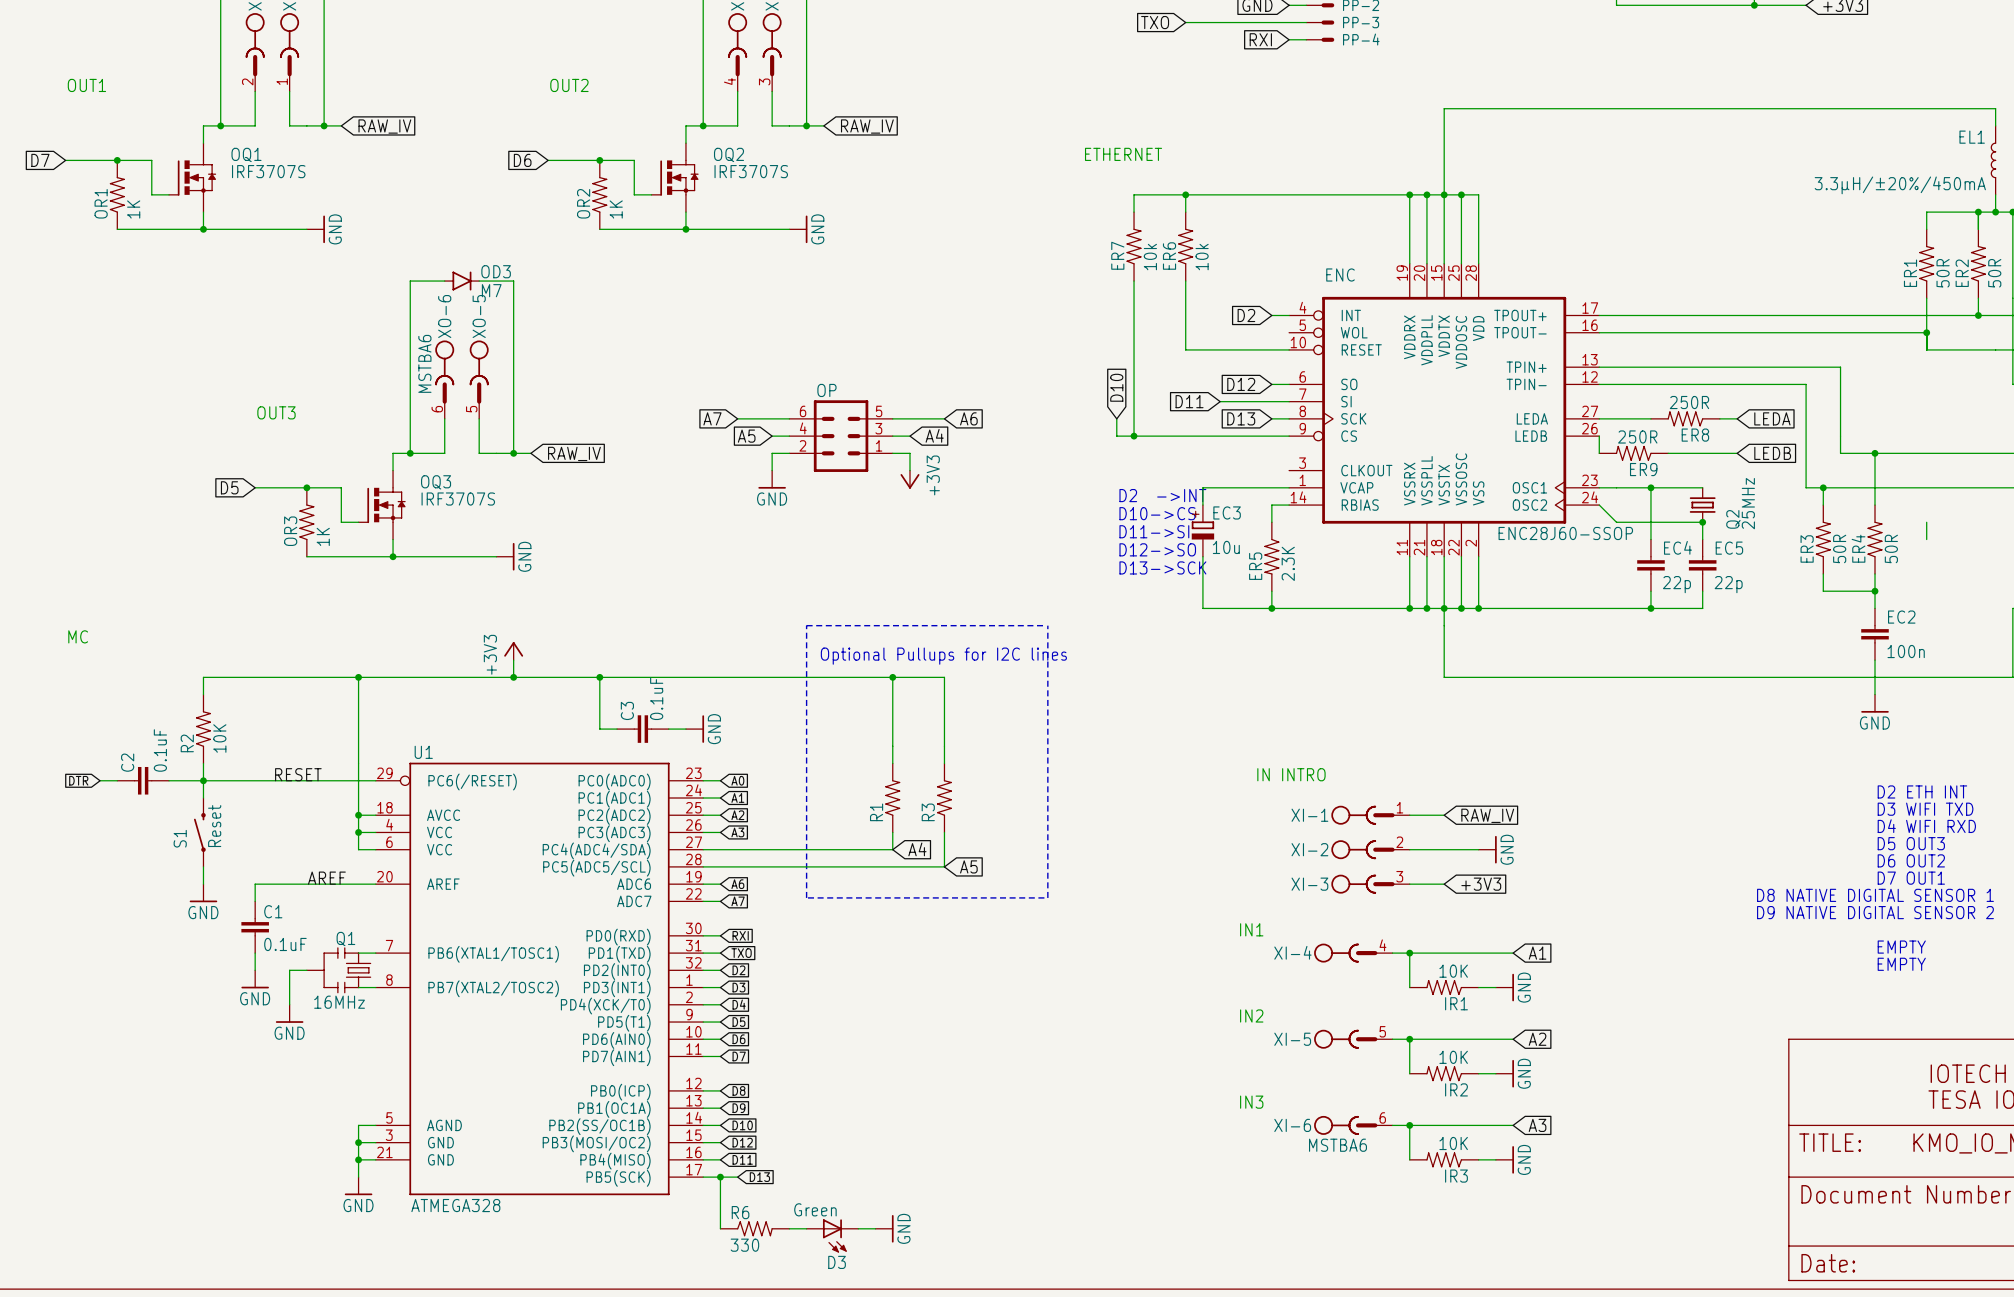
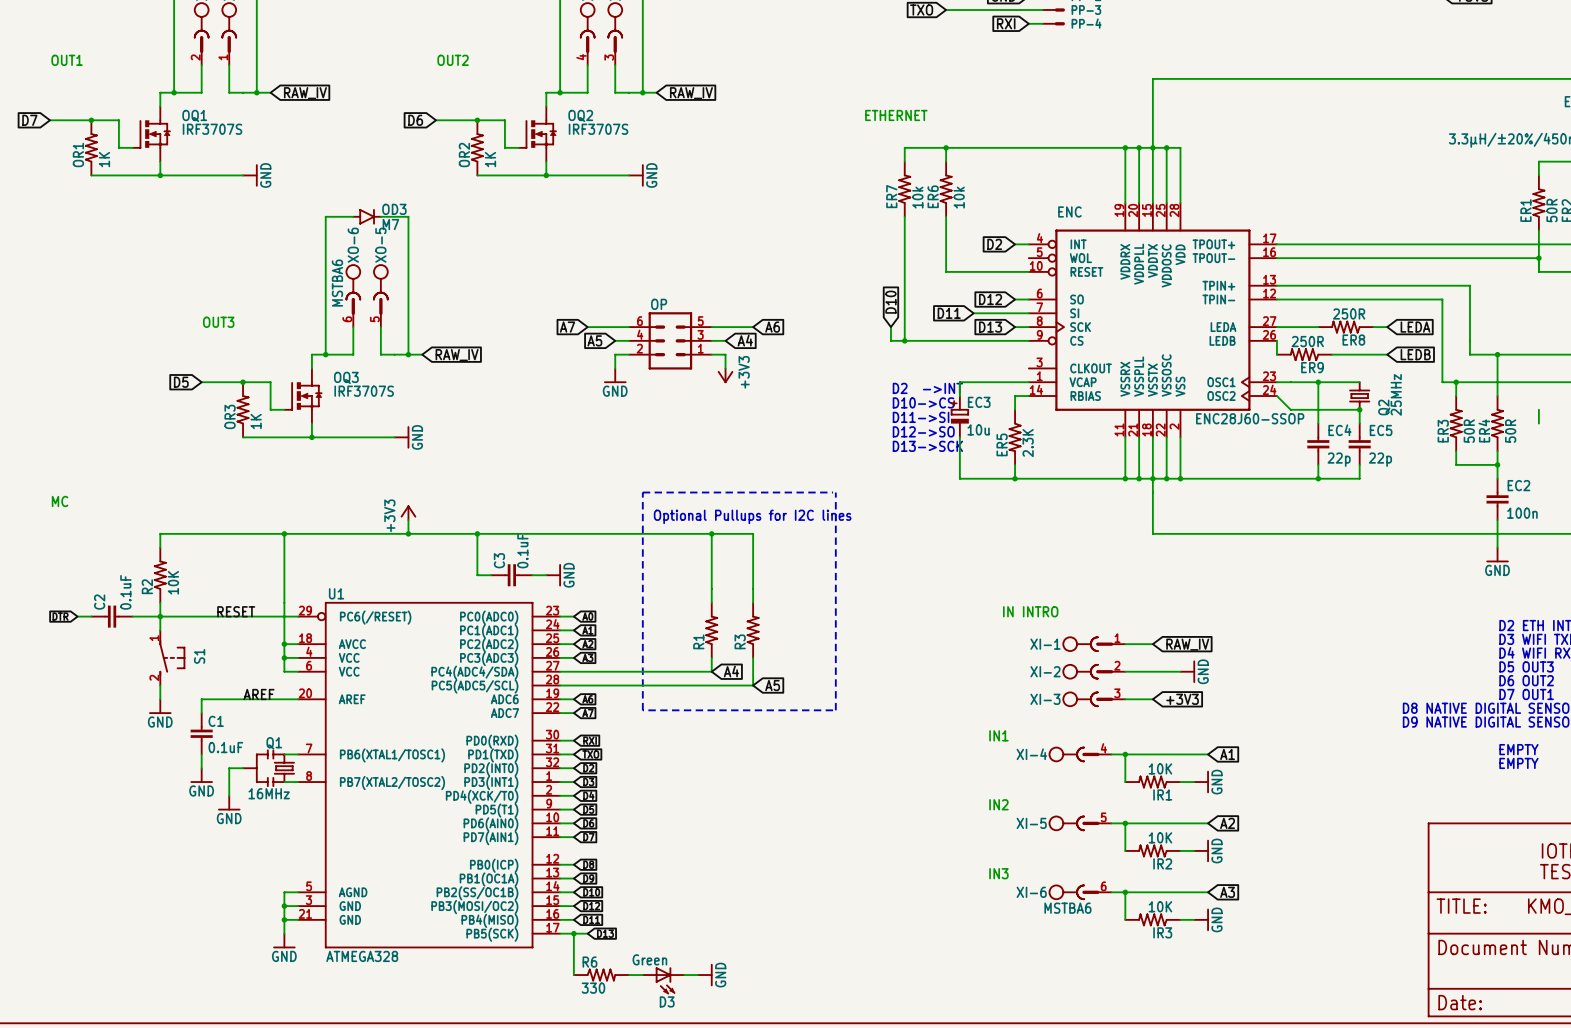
S1 symbol: [193, 798, 206, 867] -> [159, 630, 186, 686]
S1 value: Reset (214, 826) -> none
S1 name position: S1 (180, 838) -> S1 (199, 656)

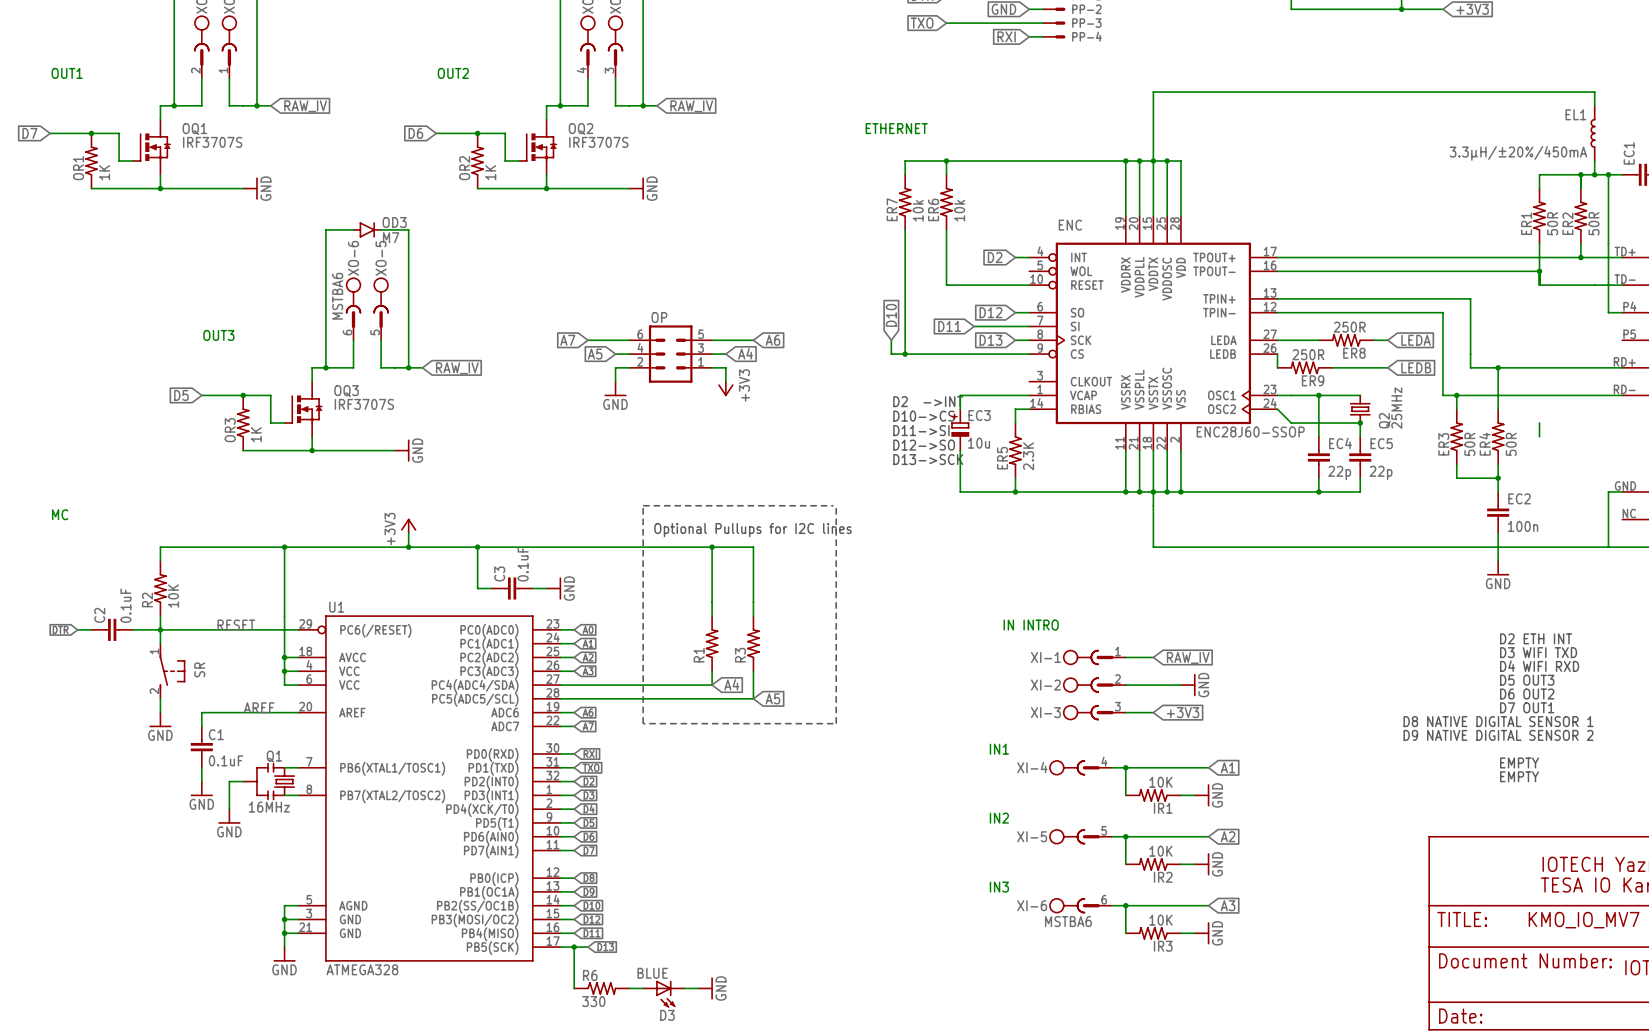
S1 name: S1 (199, 656) -> SR (199, 669)
D3 value: Green (649, 959) -> BLUE (652, 973)

